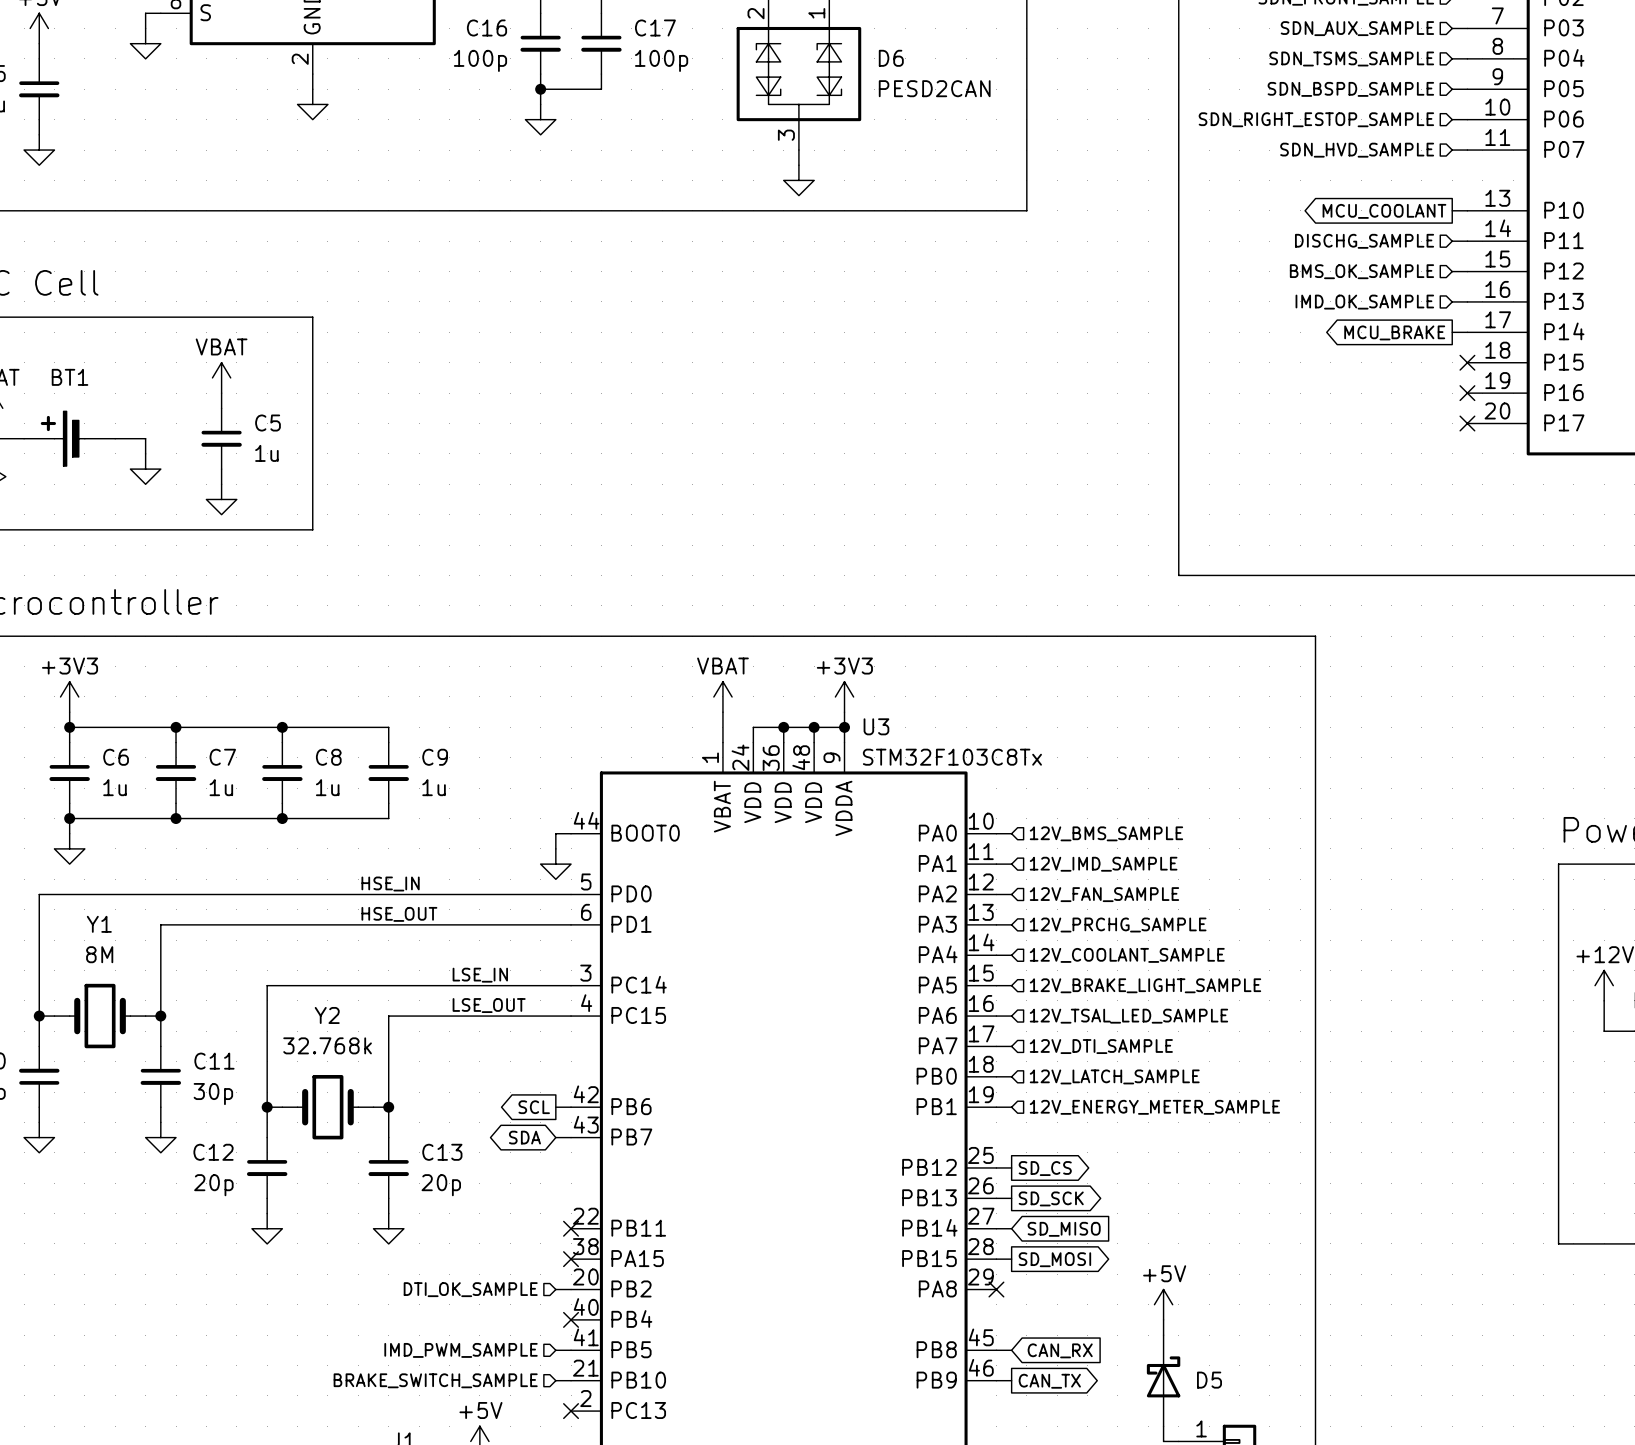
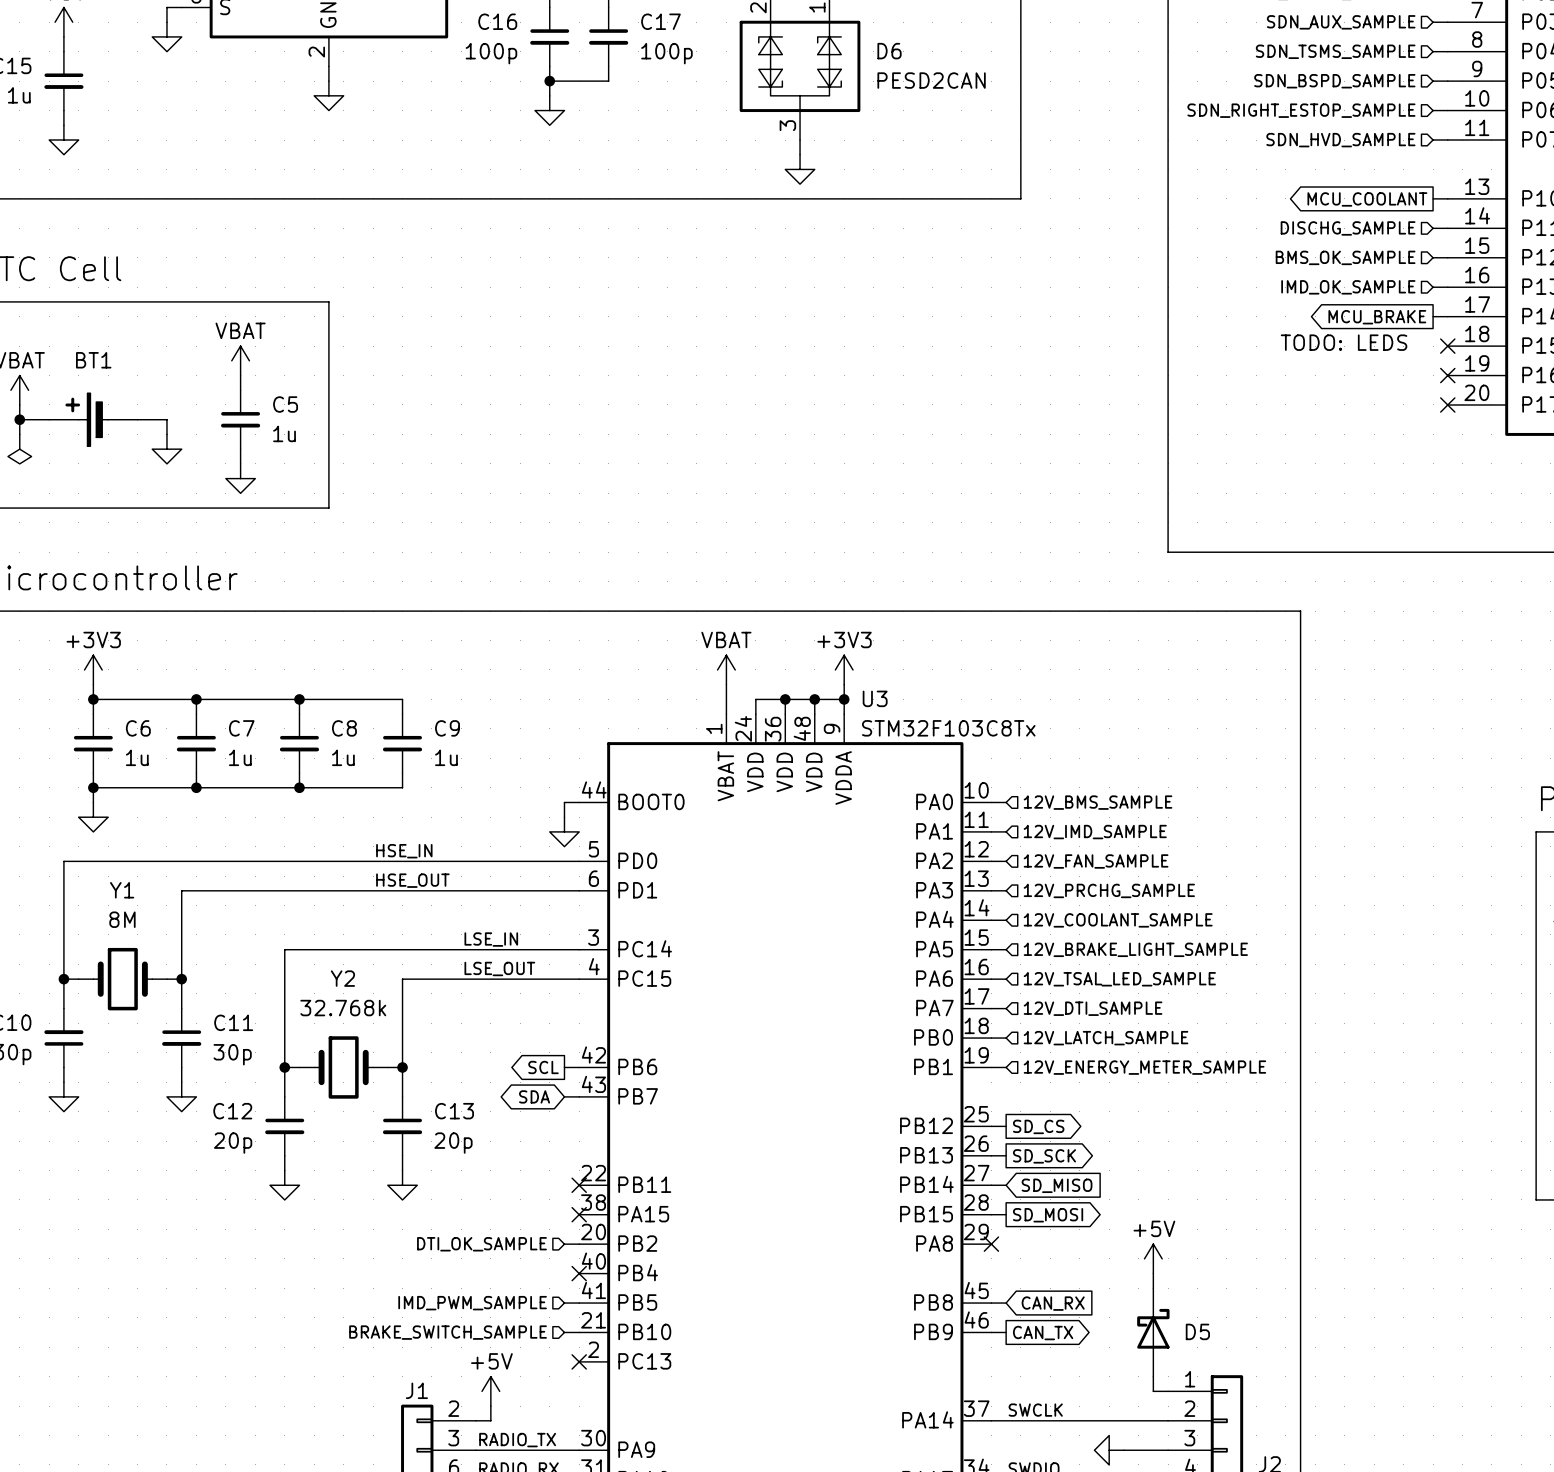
text: none -> TODO: LEDS (1344, 342)

